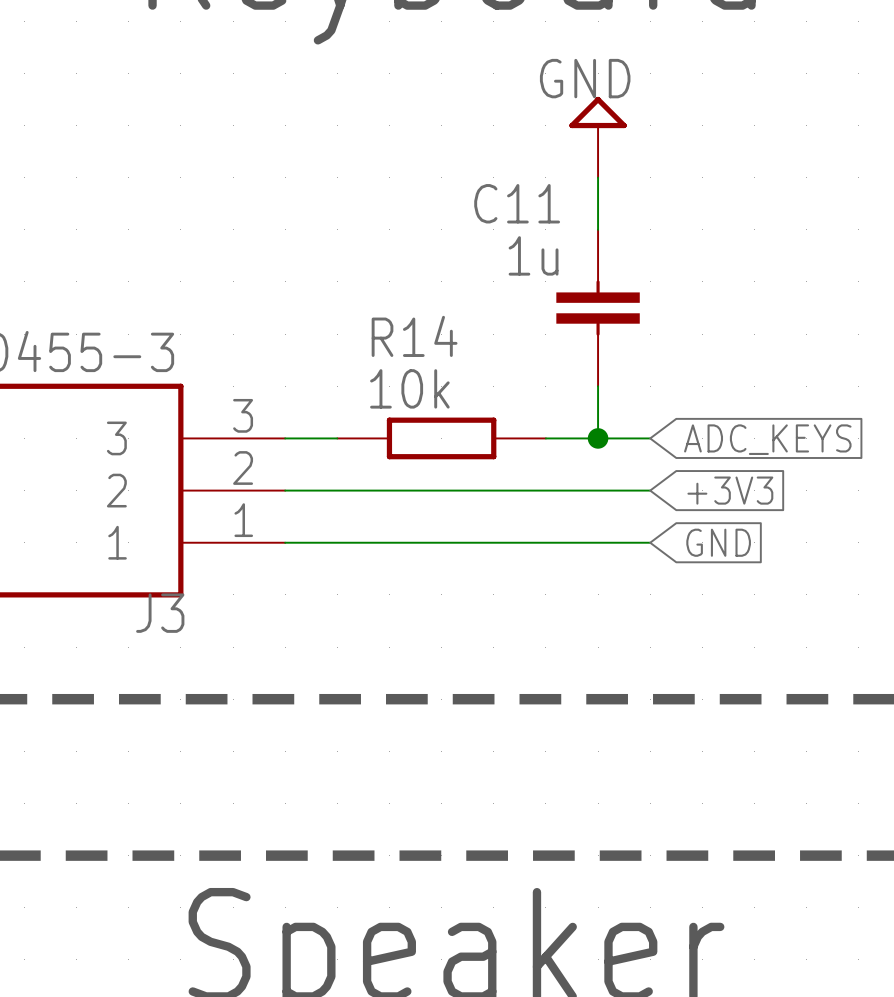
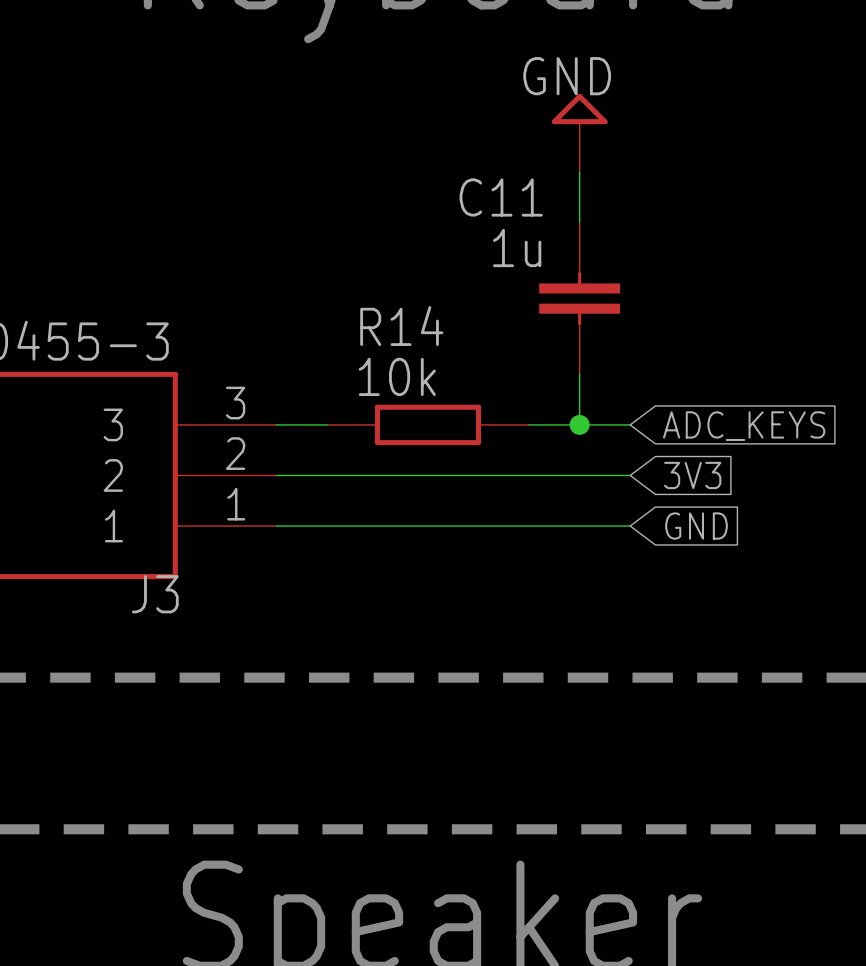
global label: +3V3 (730, 490) -> 3V3 (692, 475)

